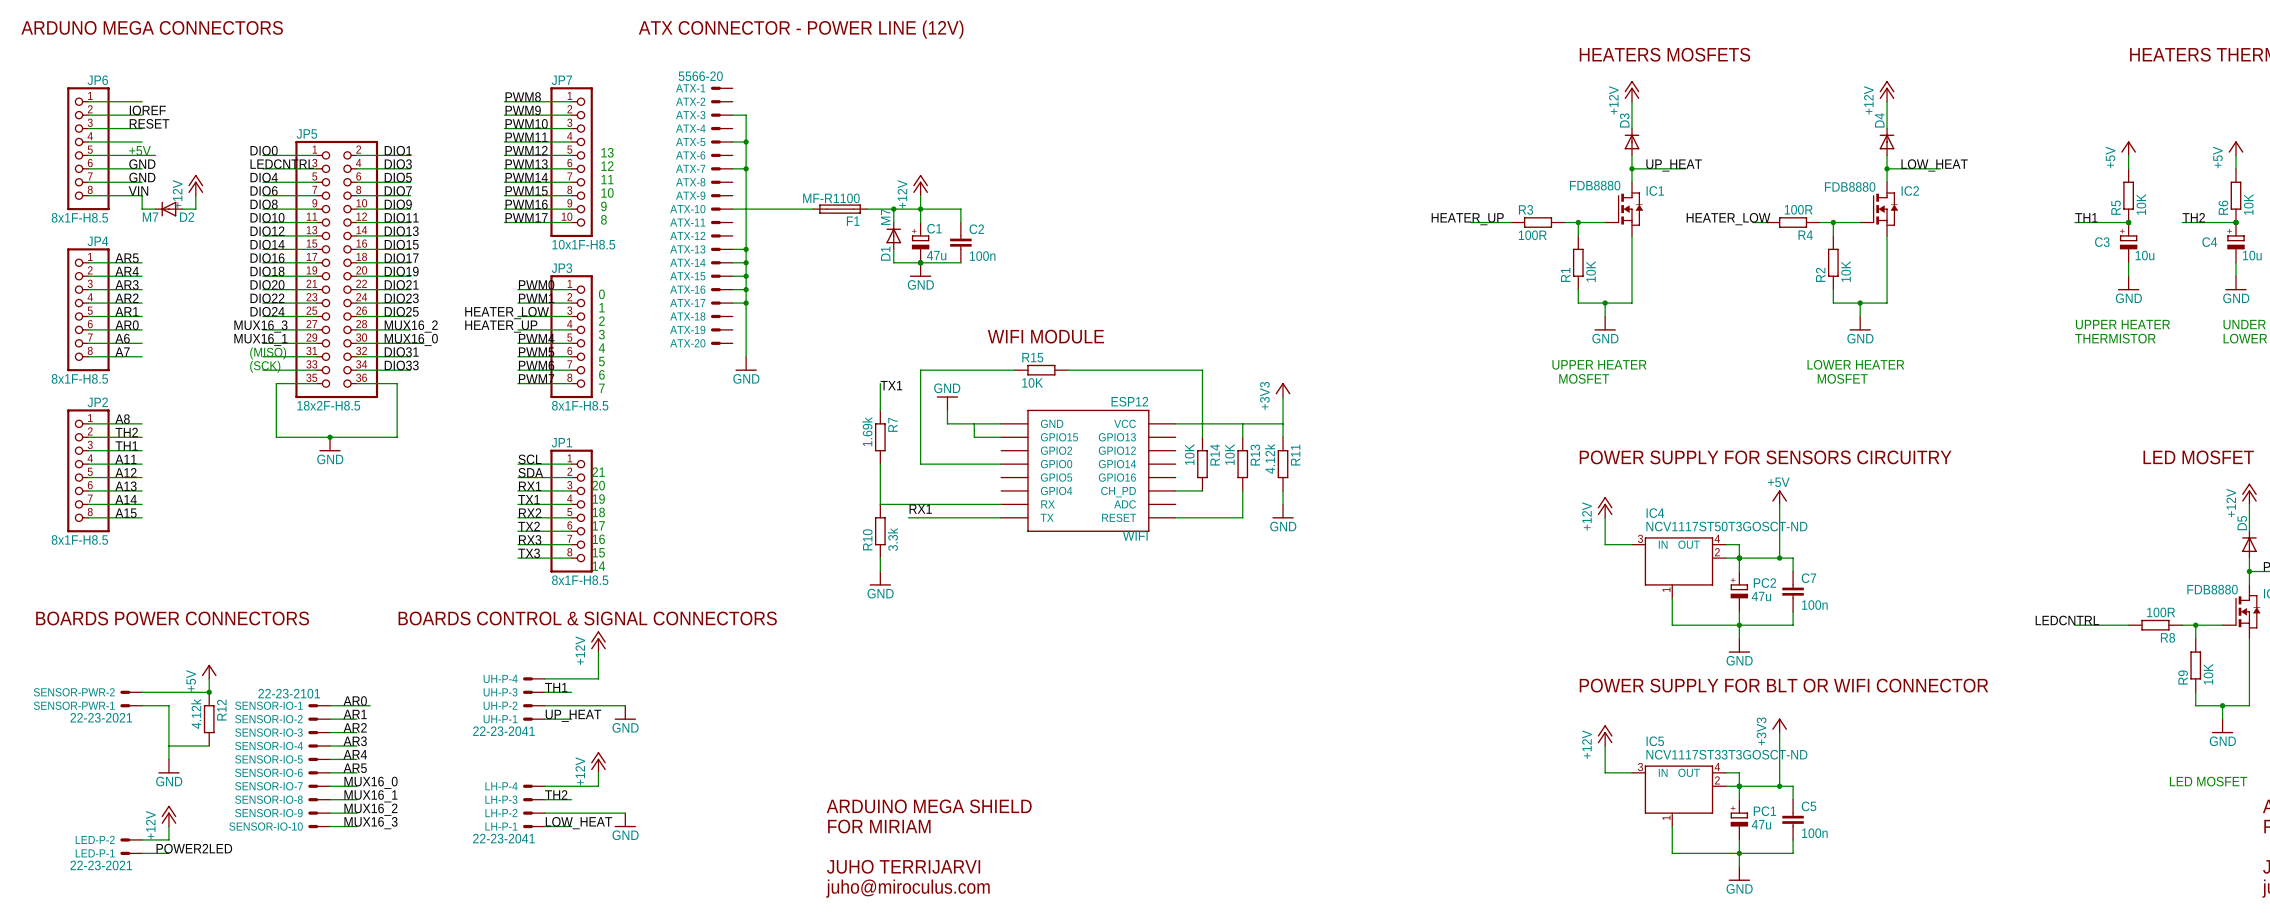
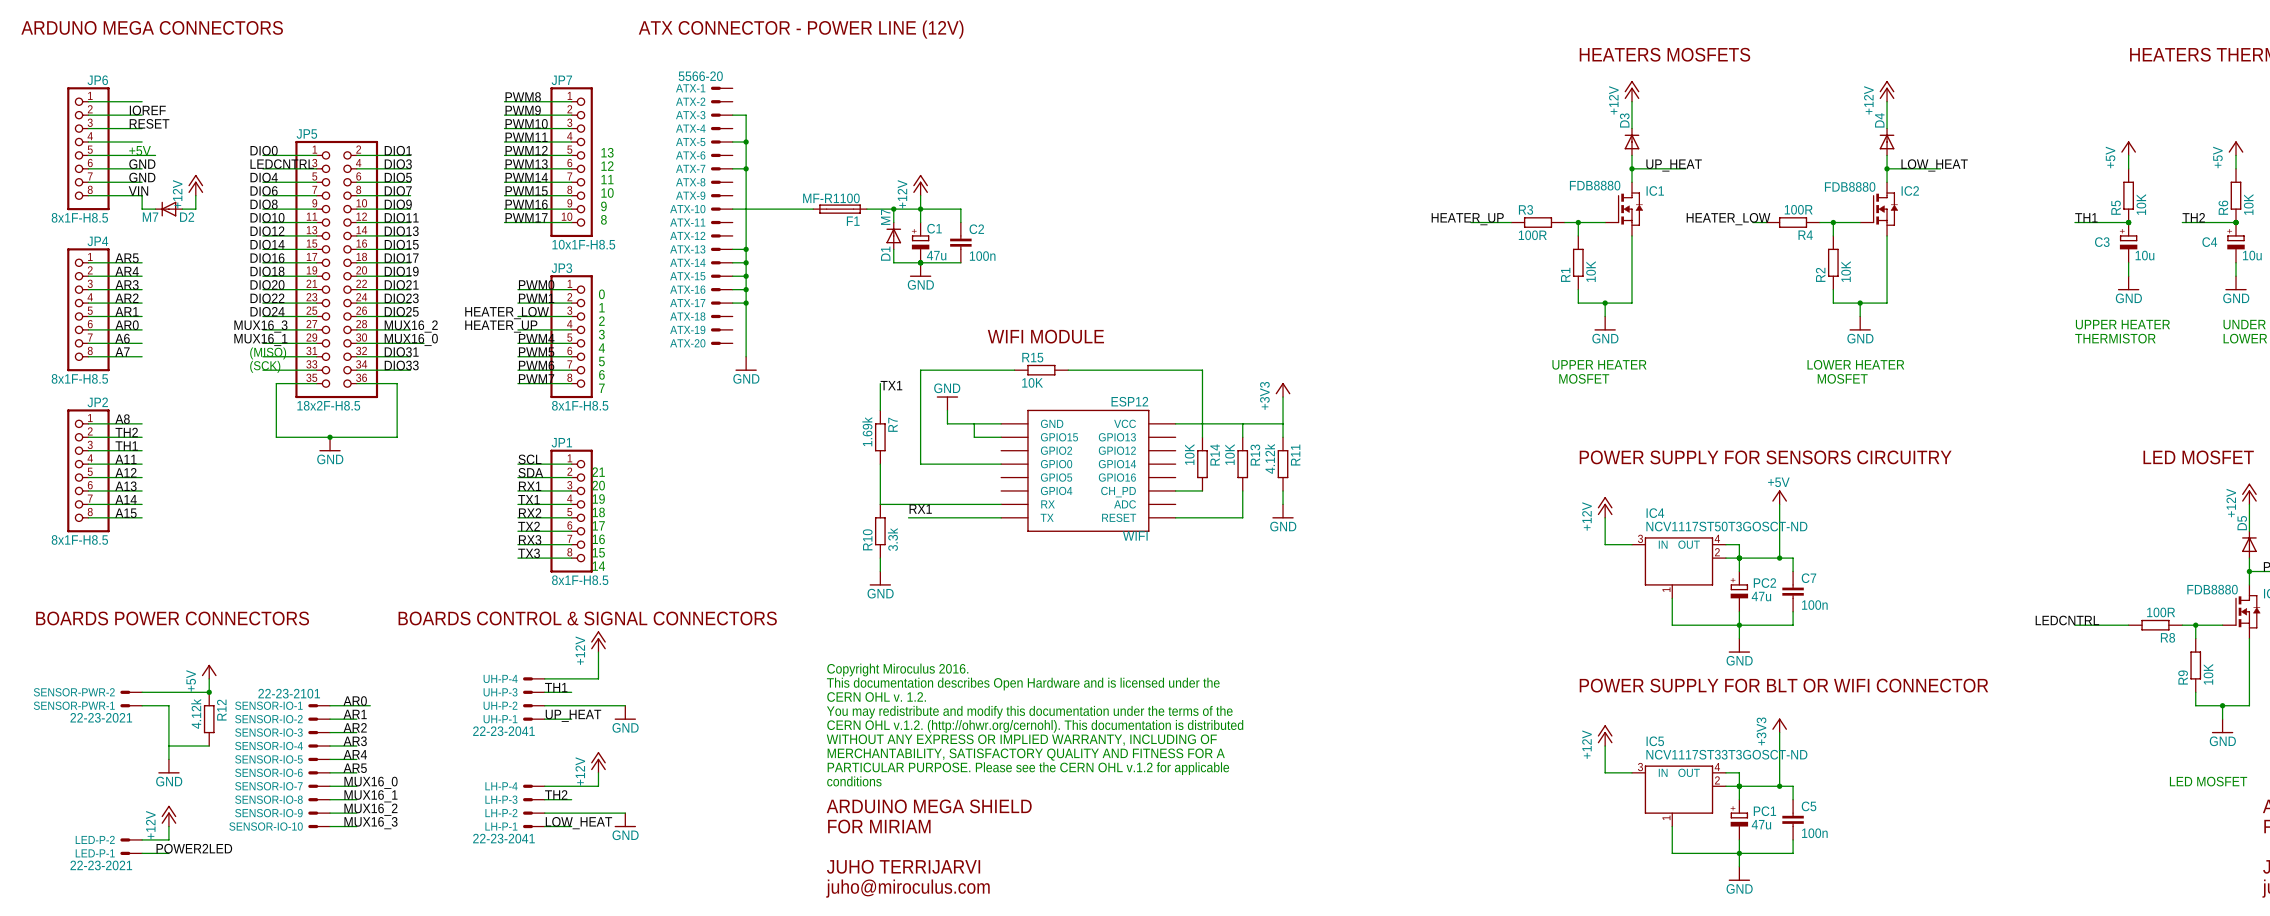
text: none -> Copyright Miroculus 2016. (897, 669)
text: none -> This documentation describes Open Hardware and is licensed under the (1023, 684)
text: none -> CERN OHL v. 1.2. (876, 697)
text: none -> You may redistribute and modify this documentation under the terms of the (1029, 712)
text: none -> CERN OHL v.1.2. (http://ohwr.org/cernohl). This documentation is distributed (1035, 726)
text: none -> WITHOUT ANY EXPRESS OR IMPLIED WARRANTY, INCLUDING OF (1021, 740)
text: none -> MERCHANTABILITY, SATISFACTORY QUALITY AND FITNESS FOR A (1026, 754)
text: none -> PARTICULAR PURPOSE. Please see the CERN OHL v.1.2 for applicable (1028, 768)
text: none -> conditions (854, 781)

